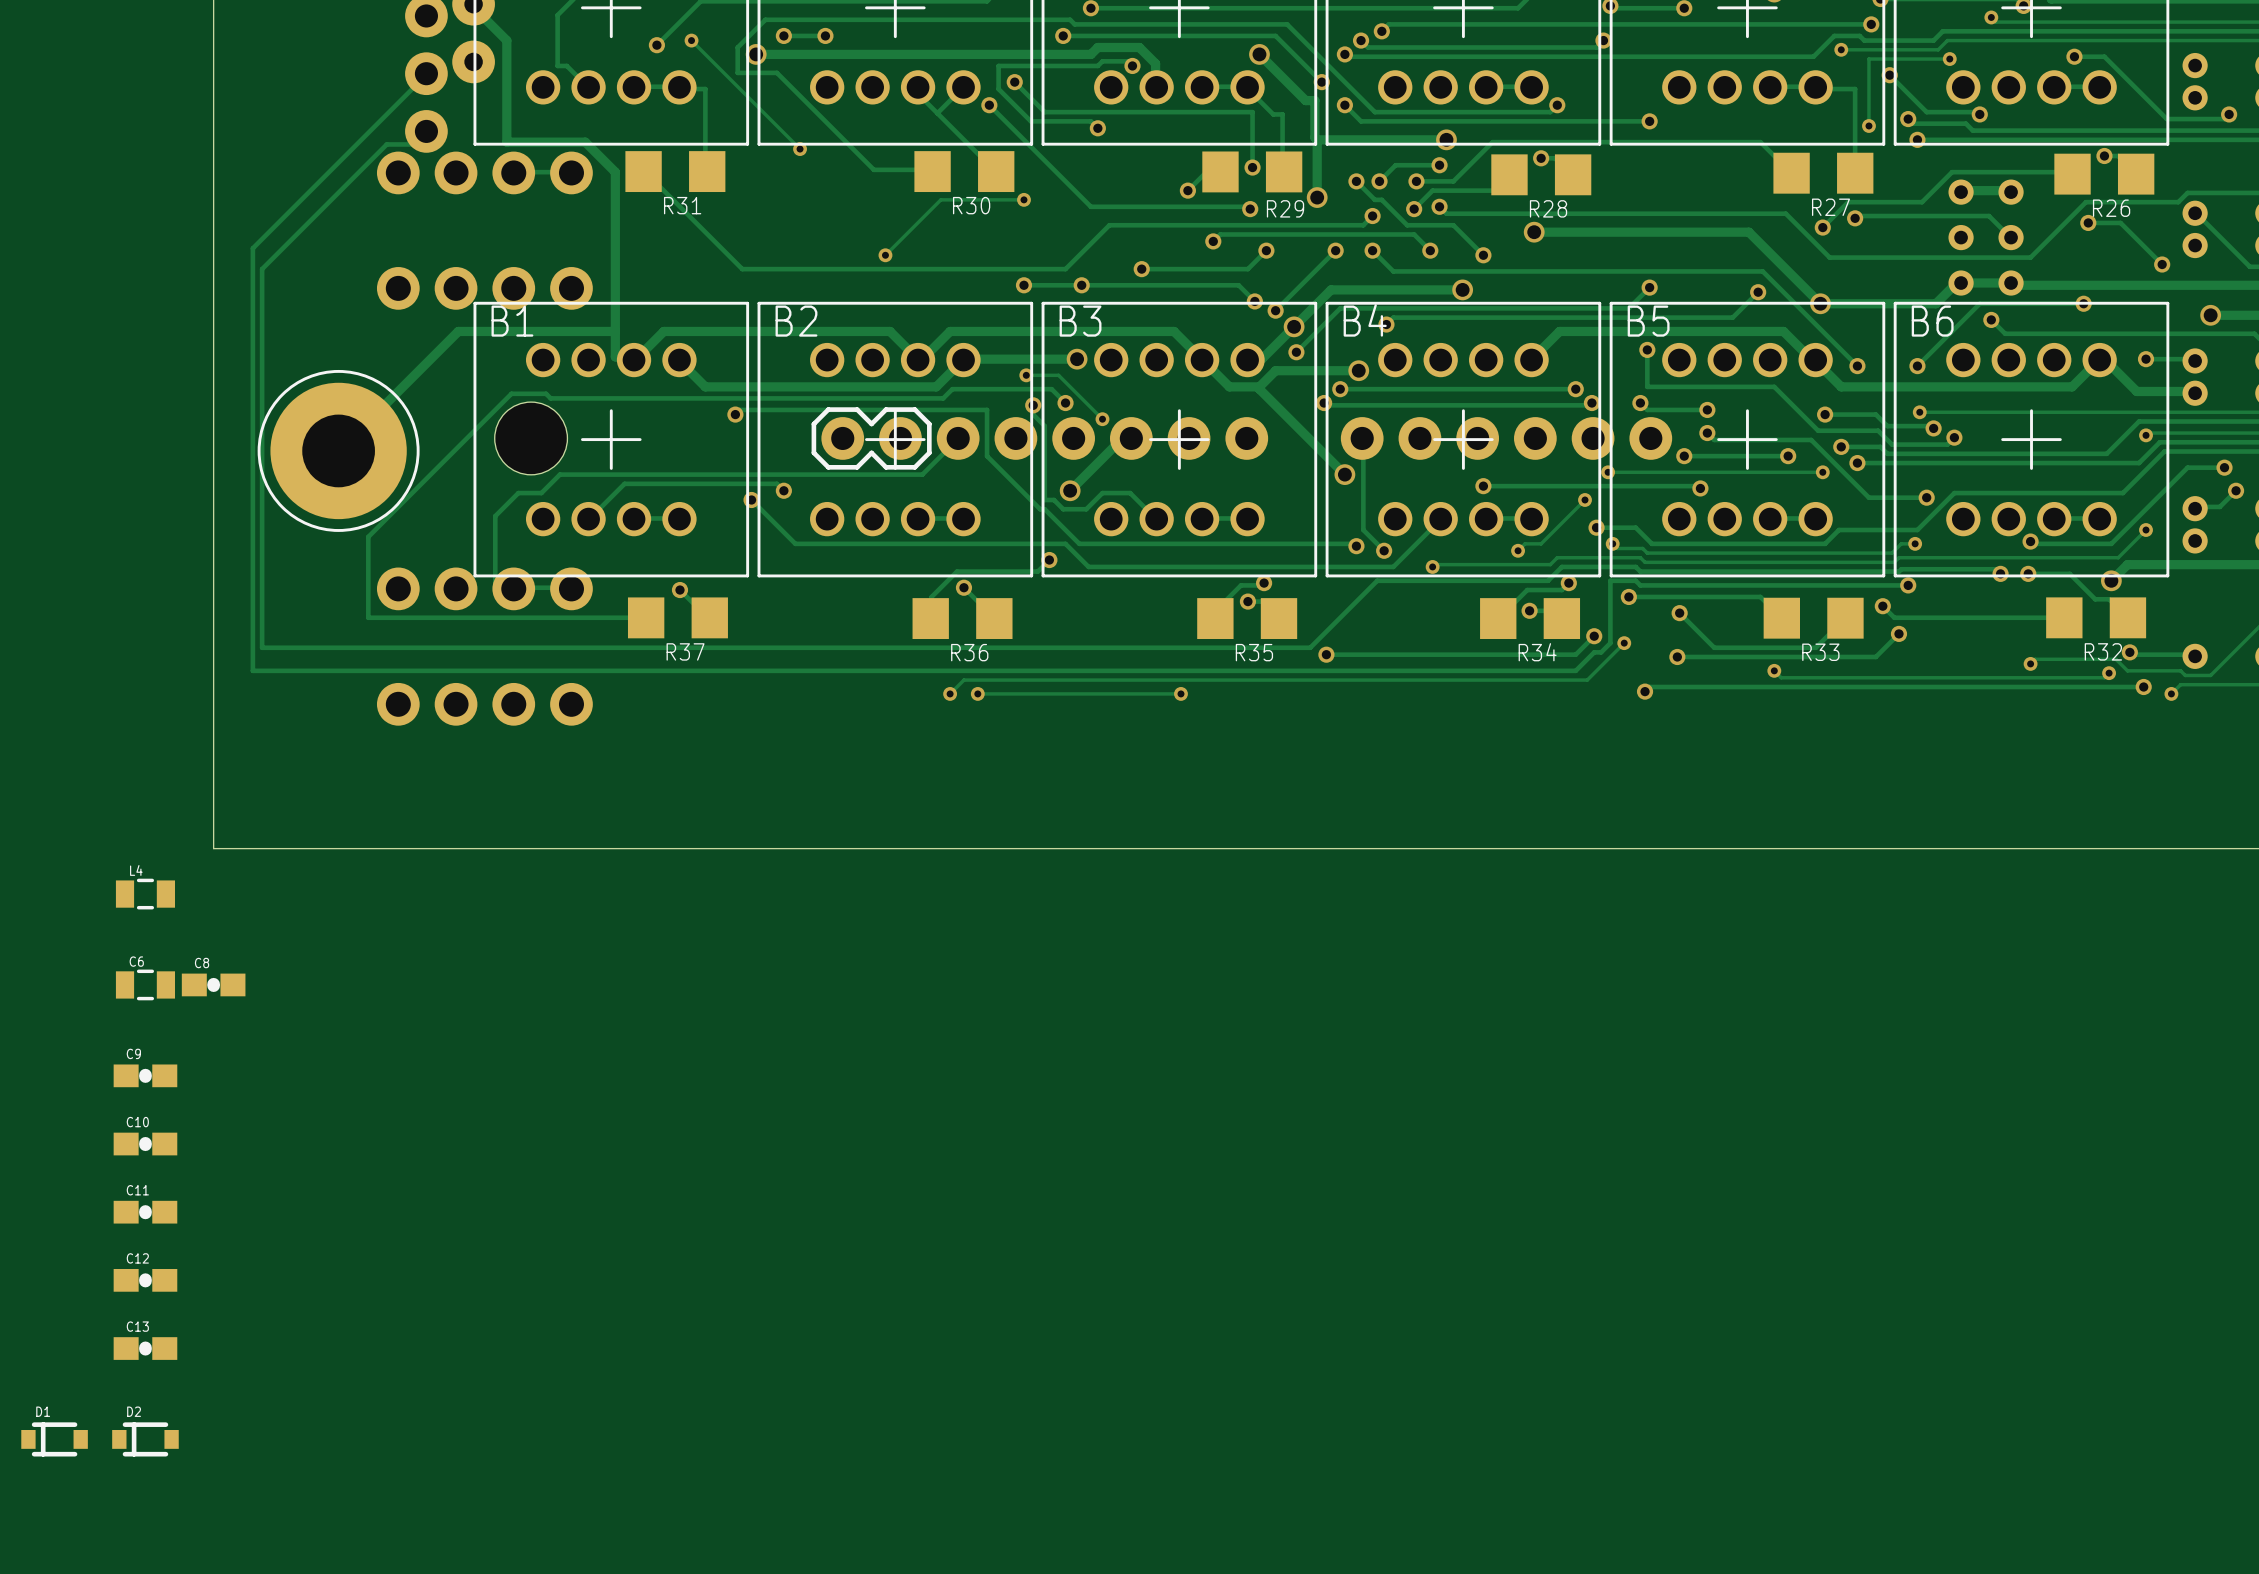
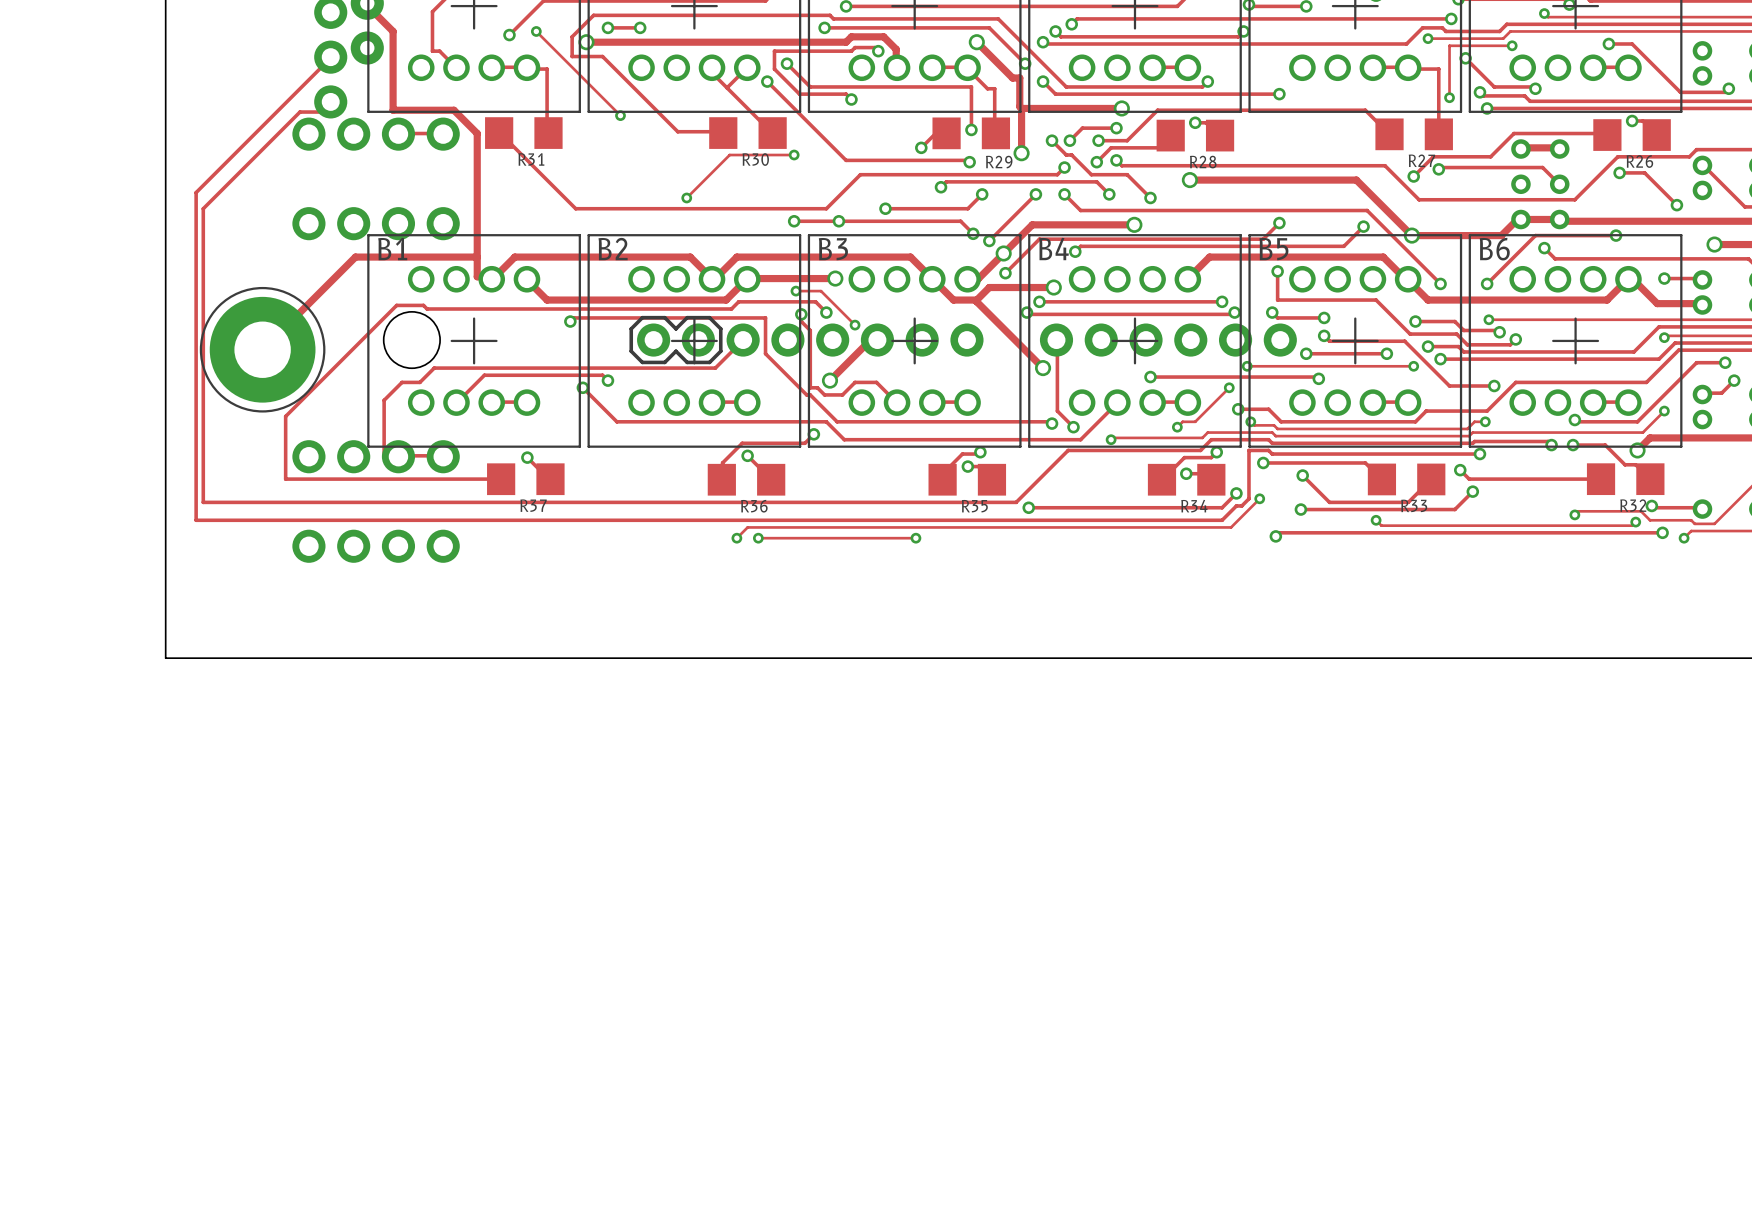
L4: (145, 894) -> none
C6: (145, 984) -> none
C8: (213, 984) -> none
C9: (145, 1075) -> none
C10: (145, 1144) -> none
C11: (145, 1212) -> none
C12: (145, 1280) -> none
C13: (145, 1348) -> none
D1: (54, 1439) -> none
D2: (145, 1439) -> none

